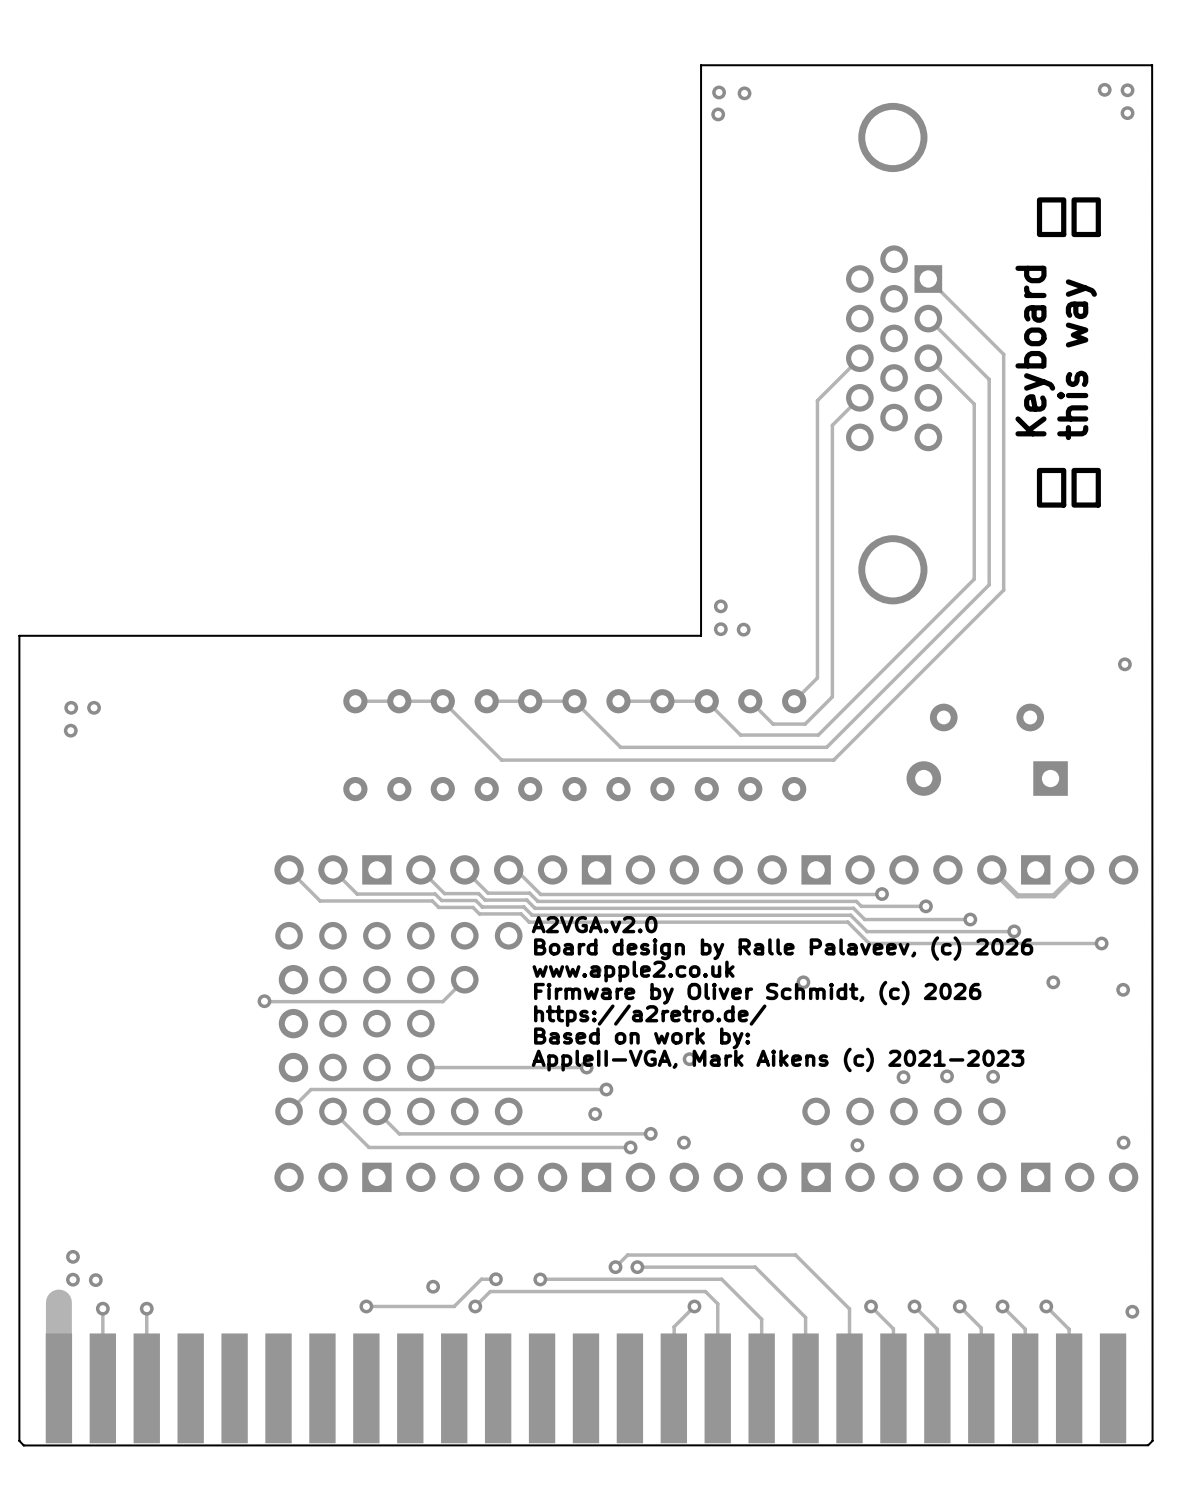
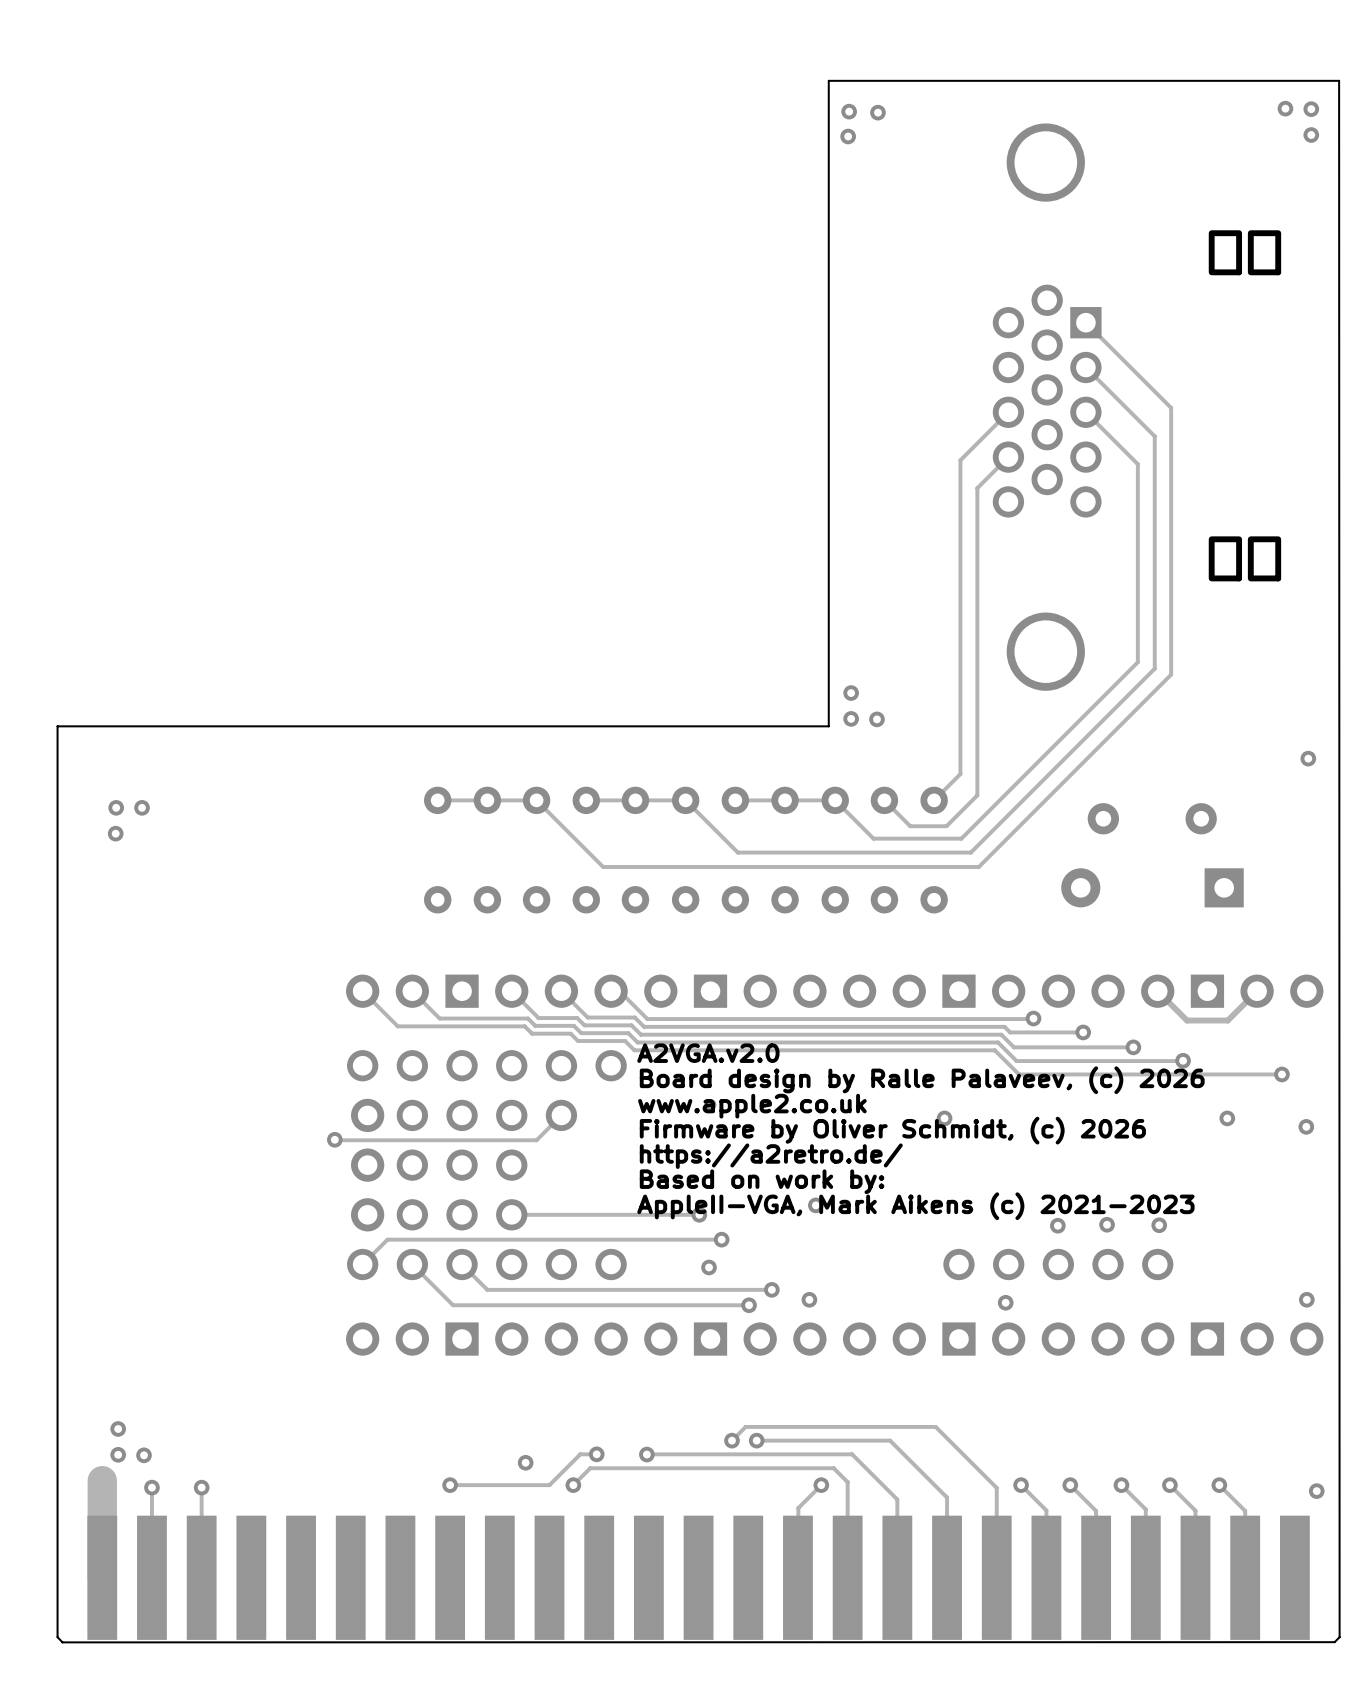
text: Keyboard (1035, 351) -> none
text: this way (1077, 359) -> none

